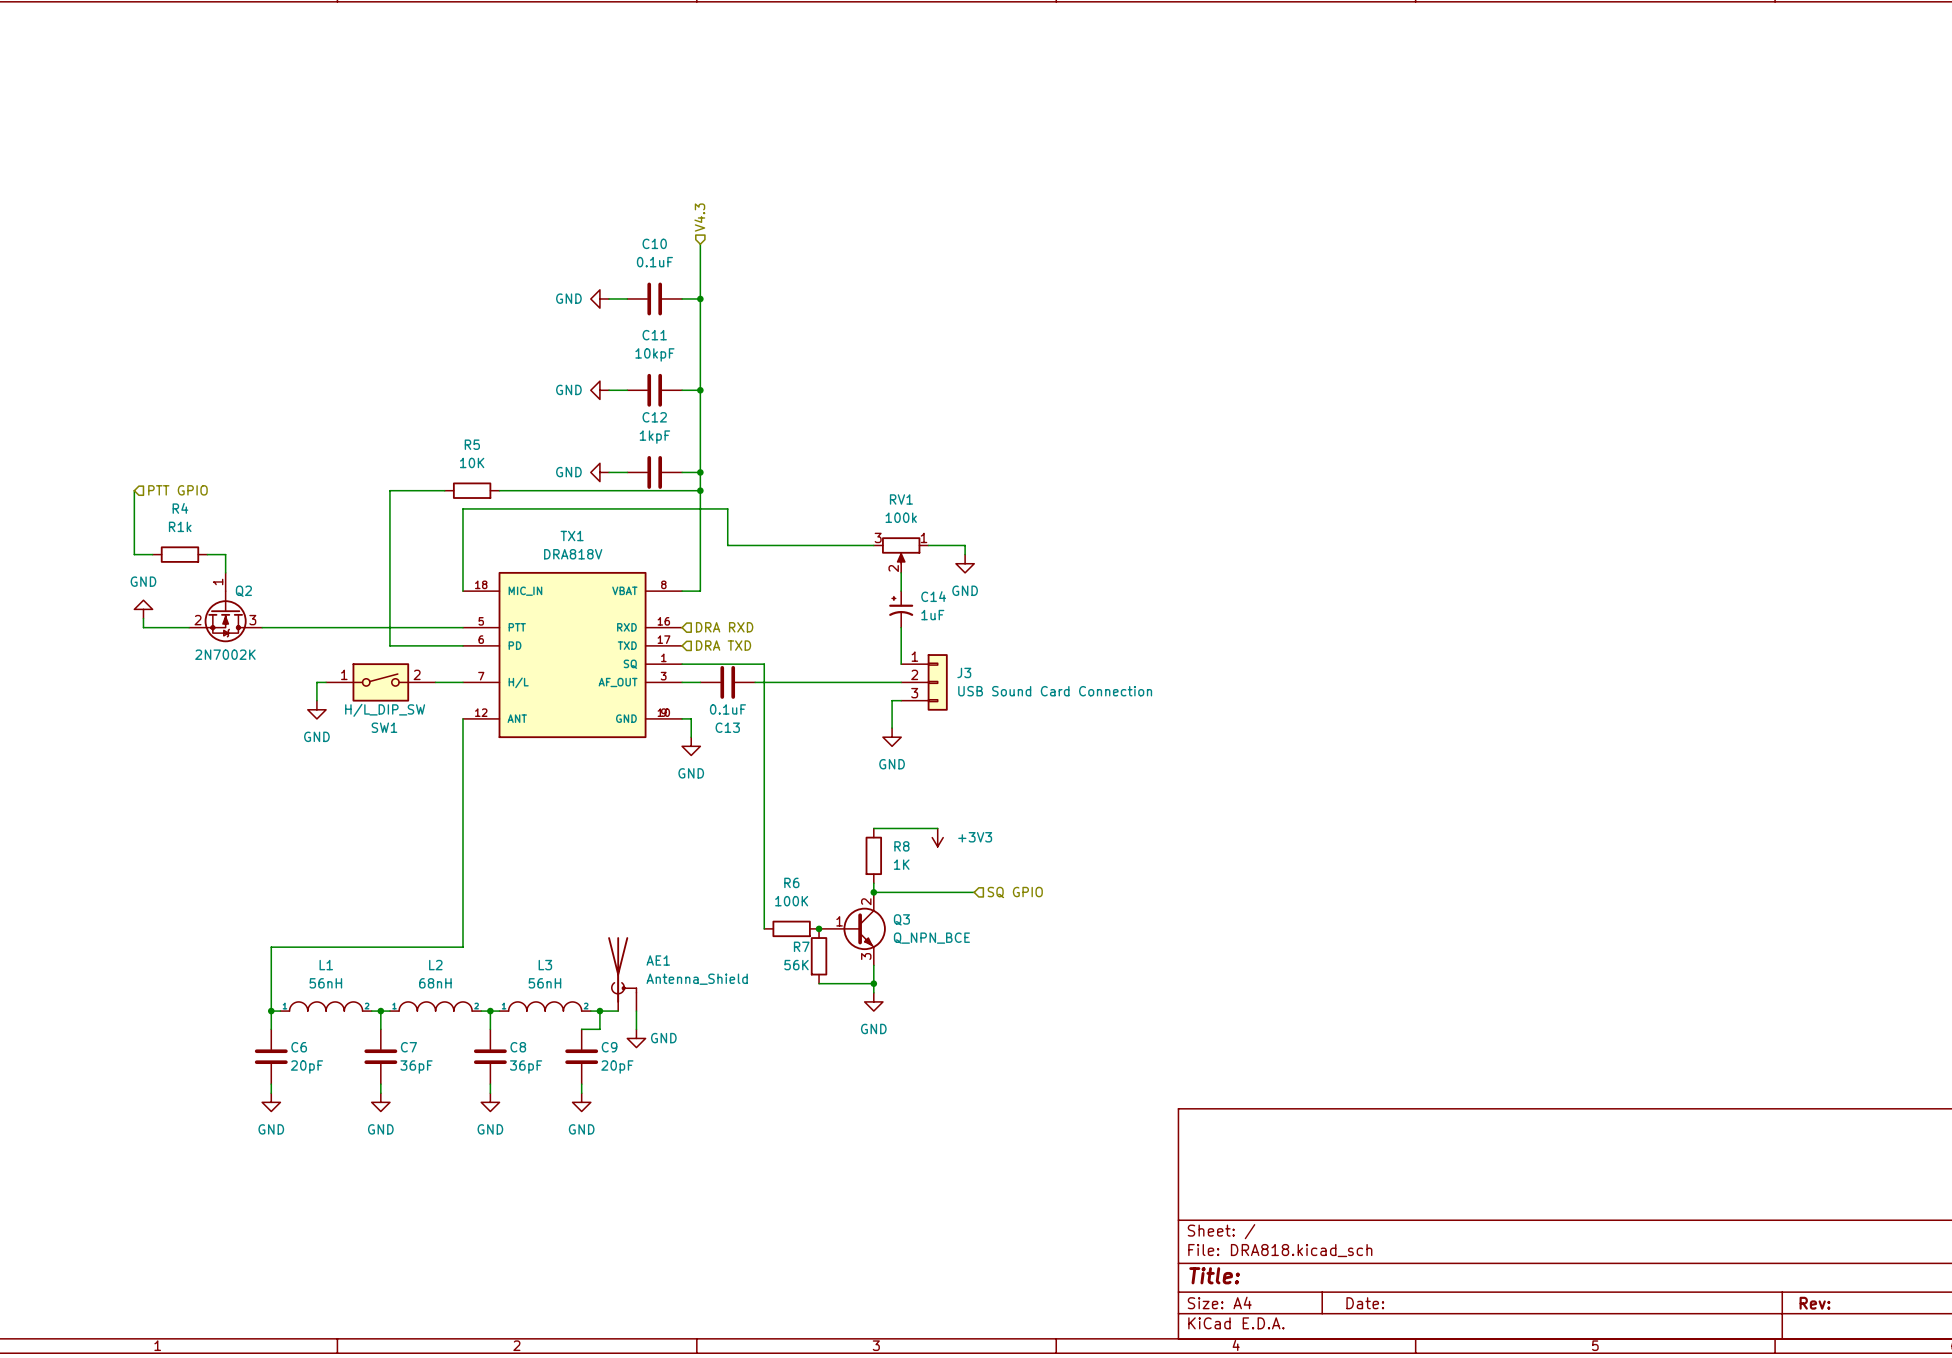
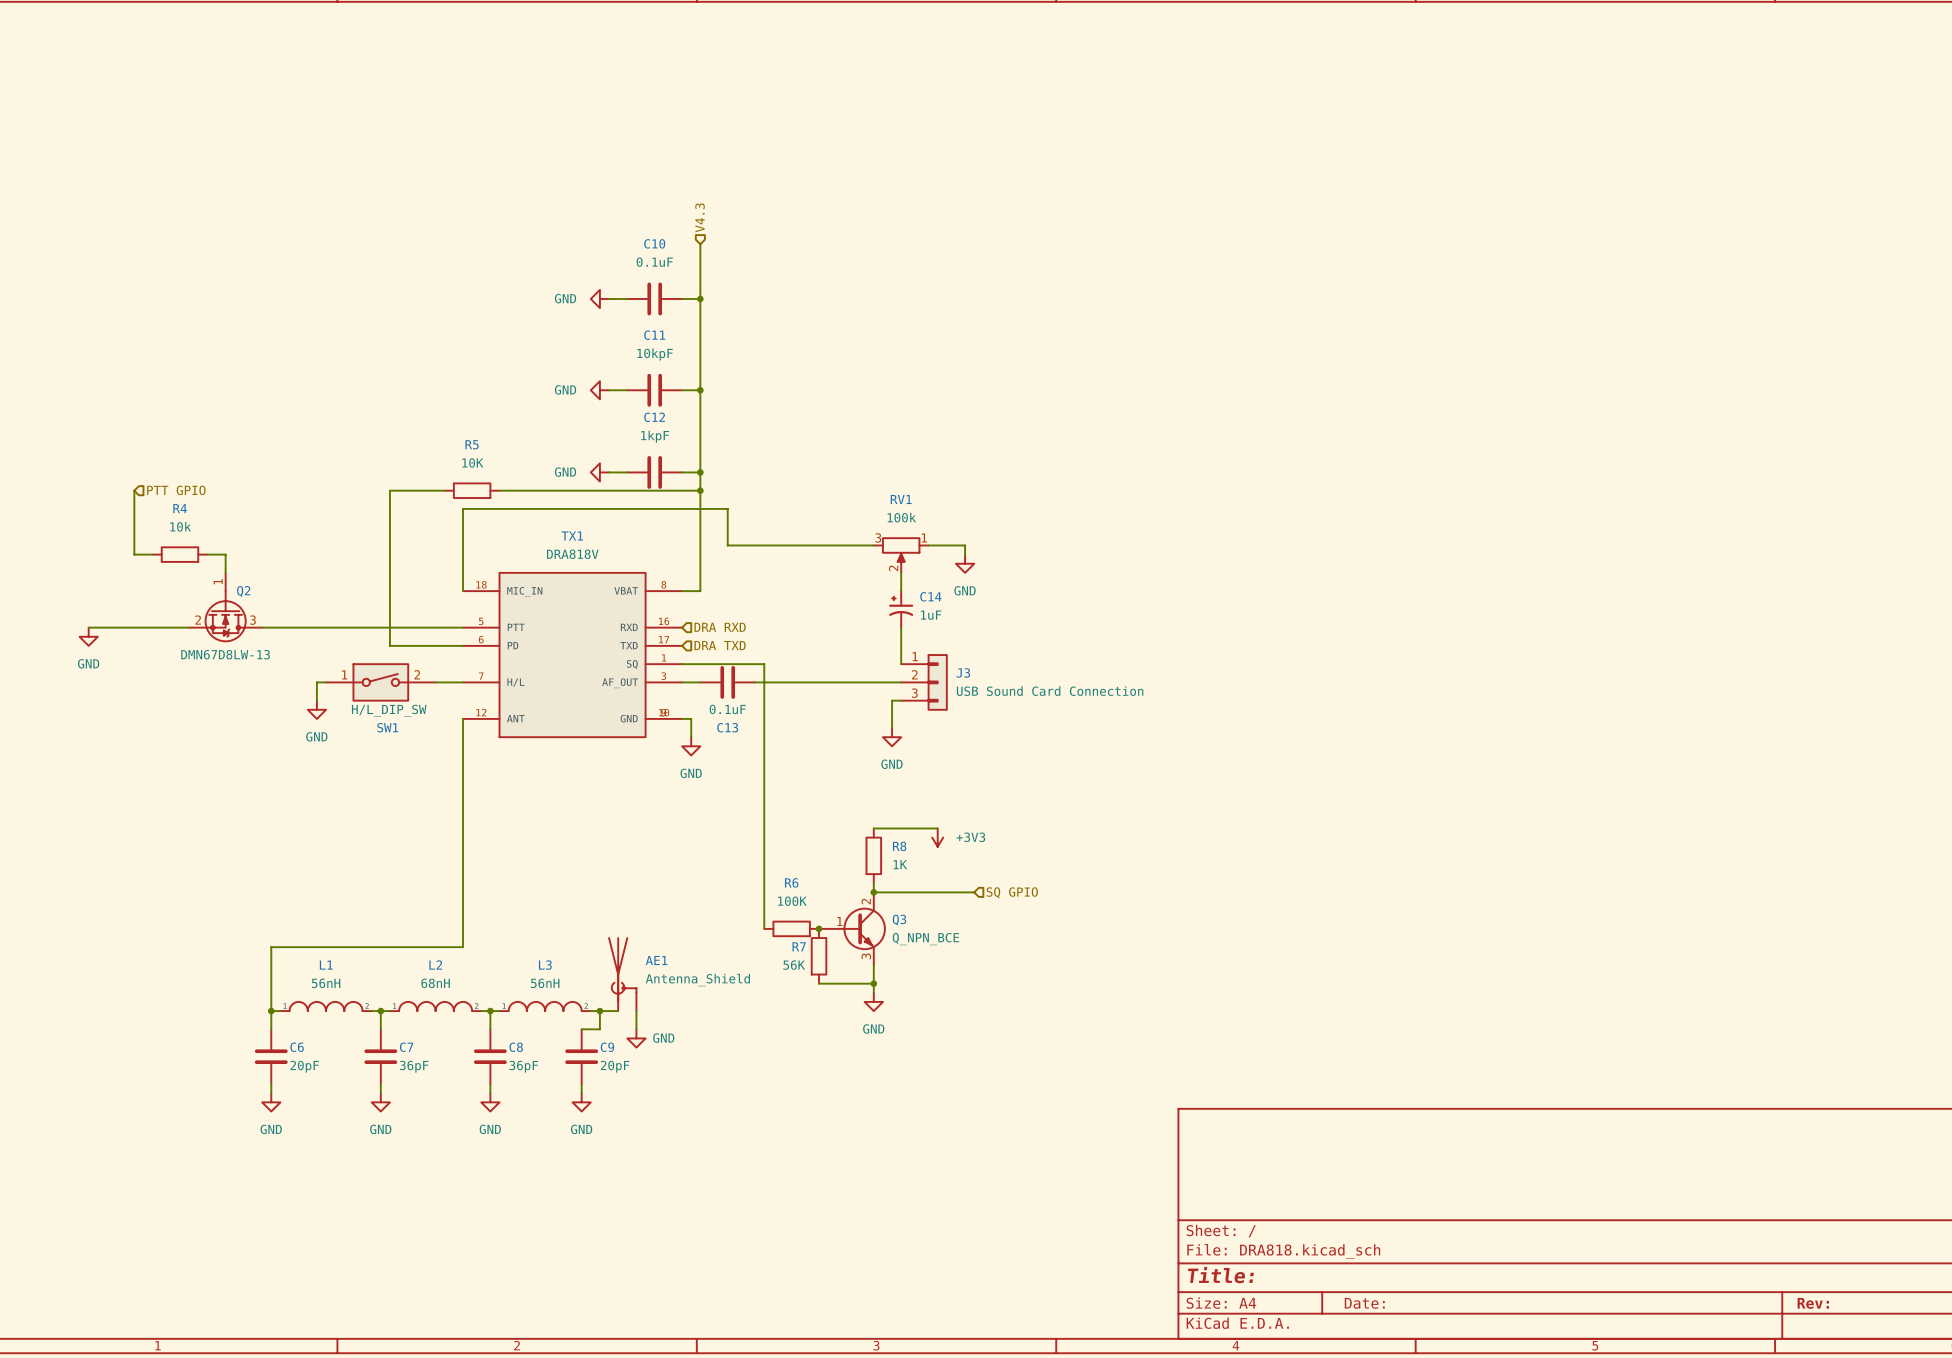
R4 value: R1k (180, 526) -> 10k (180, 526)
power symbol rotation: 0° (143, 609) -> 180° (88, 636)
power symbol position: GND (143, 609) -> GND (88, 636)
wire: (143, 618) (143, 627) -> (88, 627) (143, 627)
Q2 value: 2N7002K (225, 654) -> DMN67D8LW-13 (225, 654)

